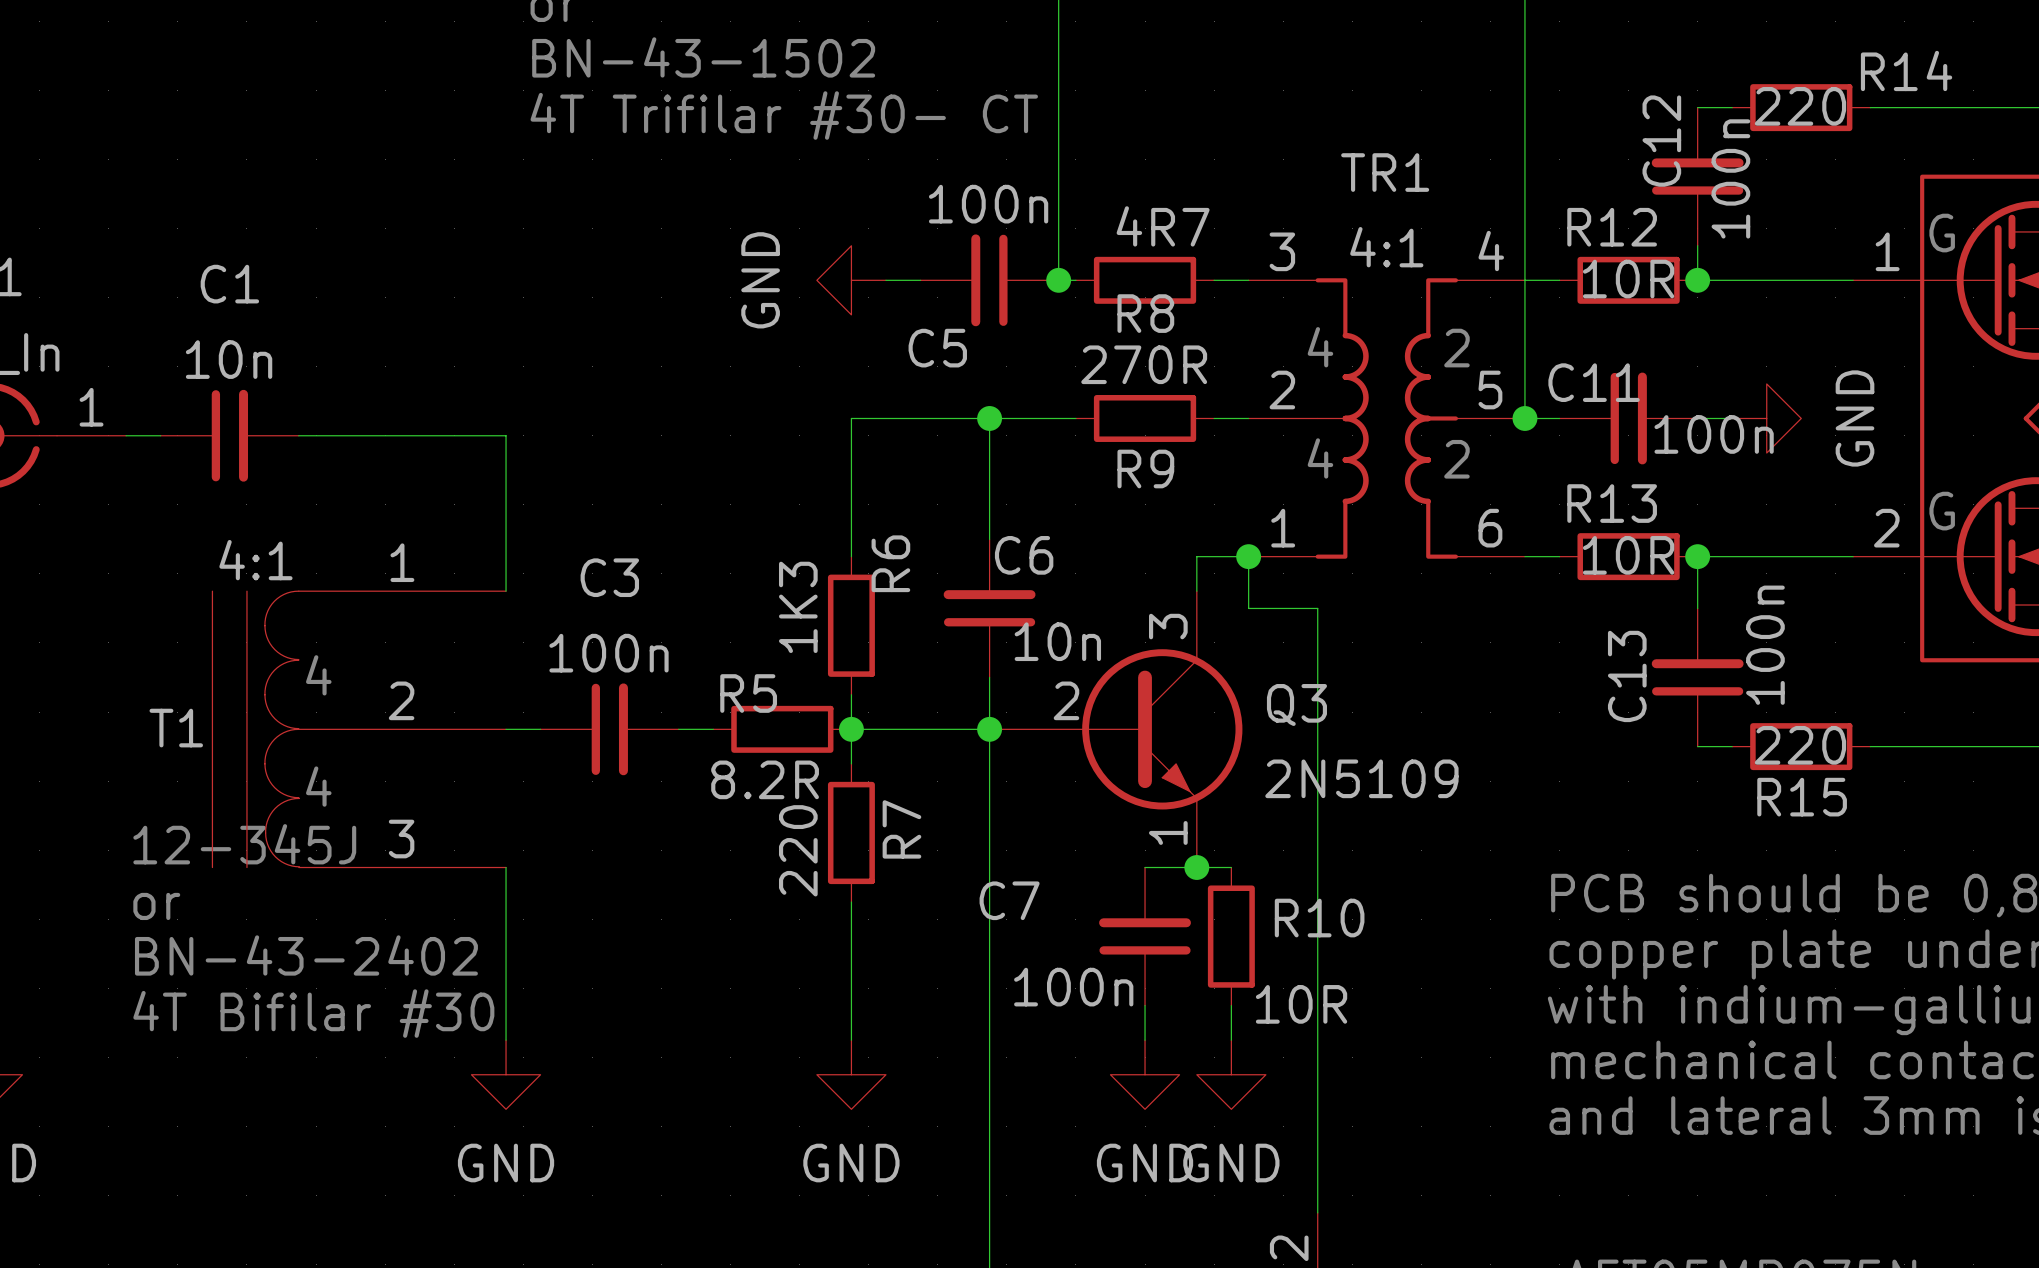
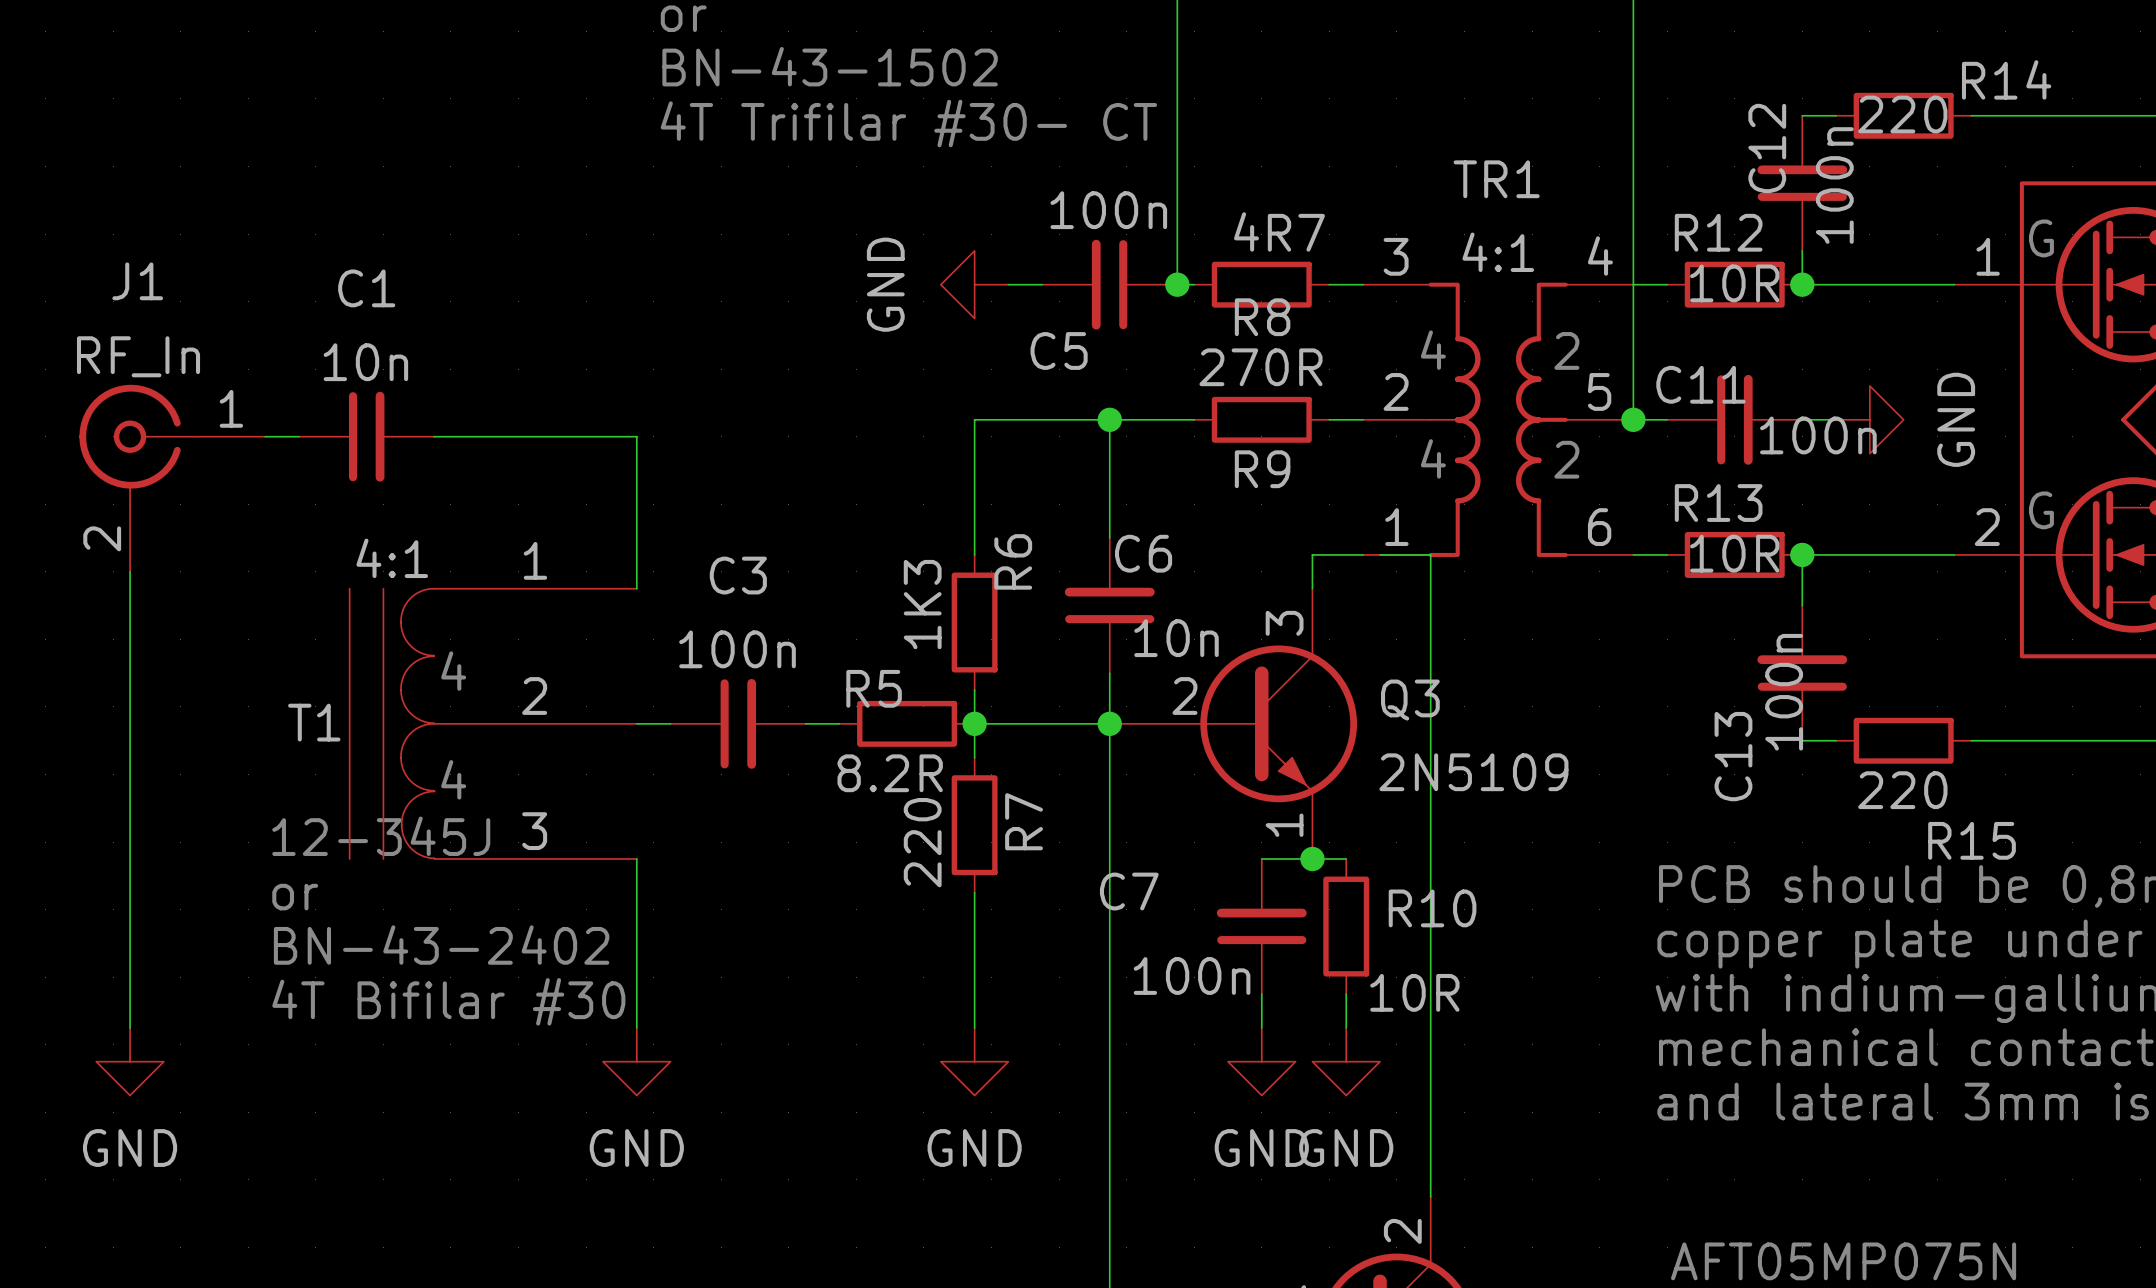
wire: (1248, 556) (1248, 608) (1317, 608) -> (1380, 554) (1430, 554) (1430, 605)
junction: (1248, 556) -> none
C13 value position: 100n (1765, 645) -> 100n (1784, 692)
C13 name position: C13 (1627, 676) -> C13 (1733, 756)
R15 value position: 220 (1800, 745) -> 220 (1902, 790)
R15 name position: R15 (1802, 797) -> R15 (1972, 840)

